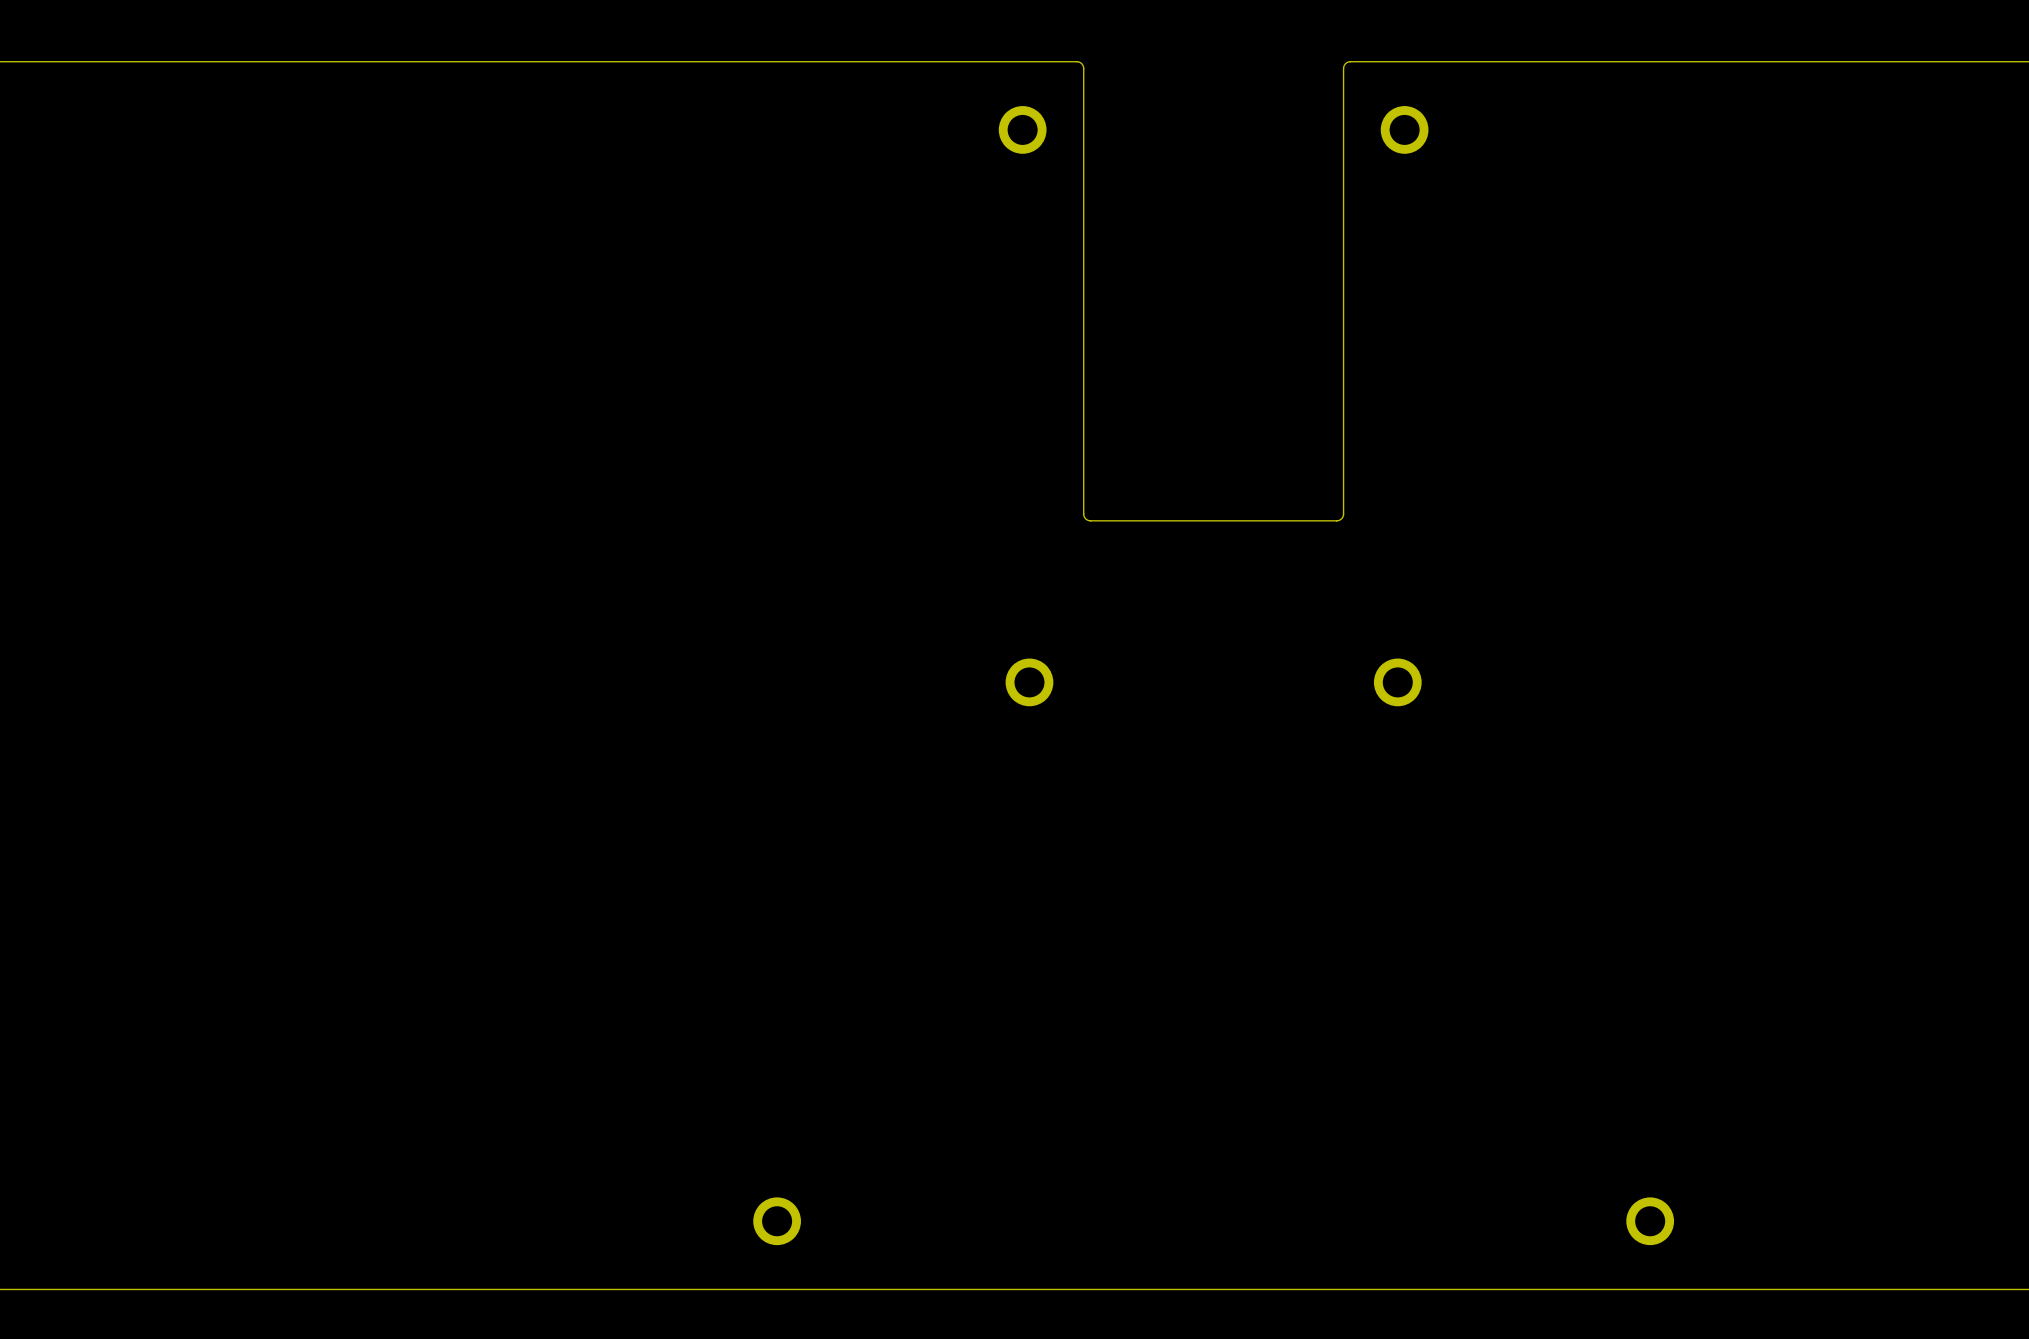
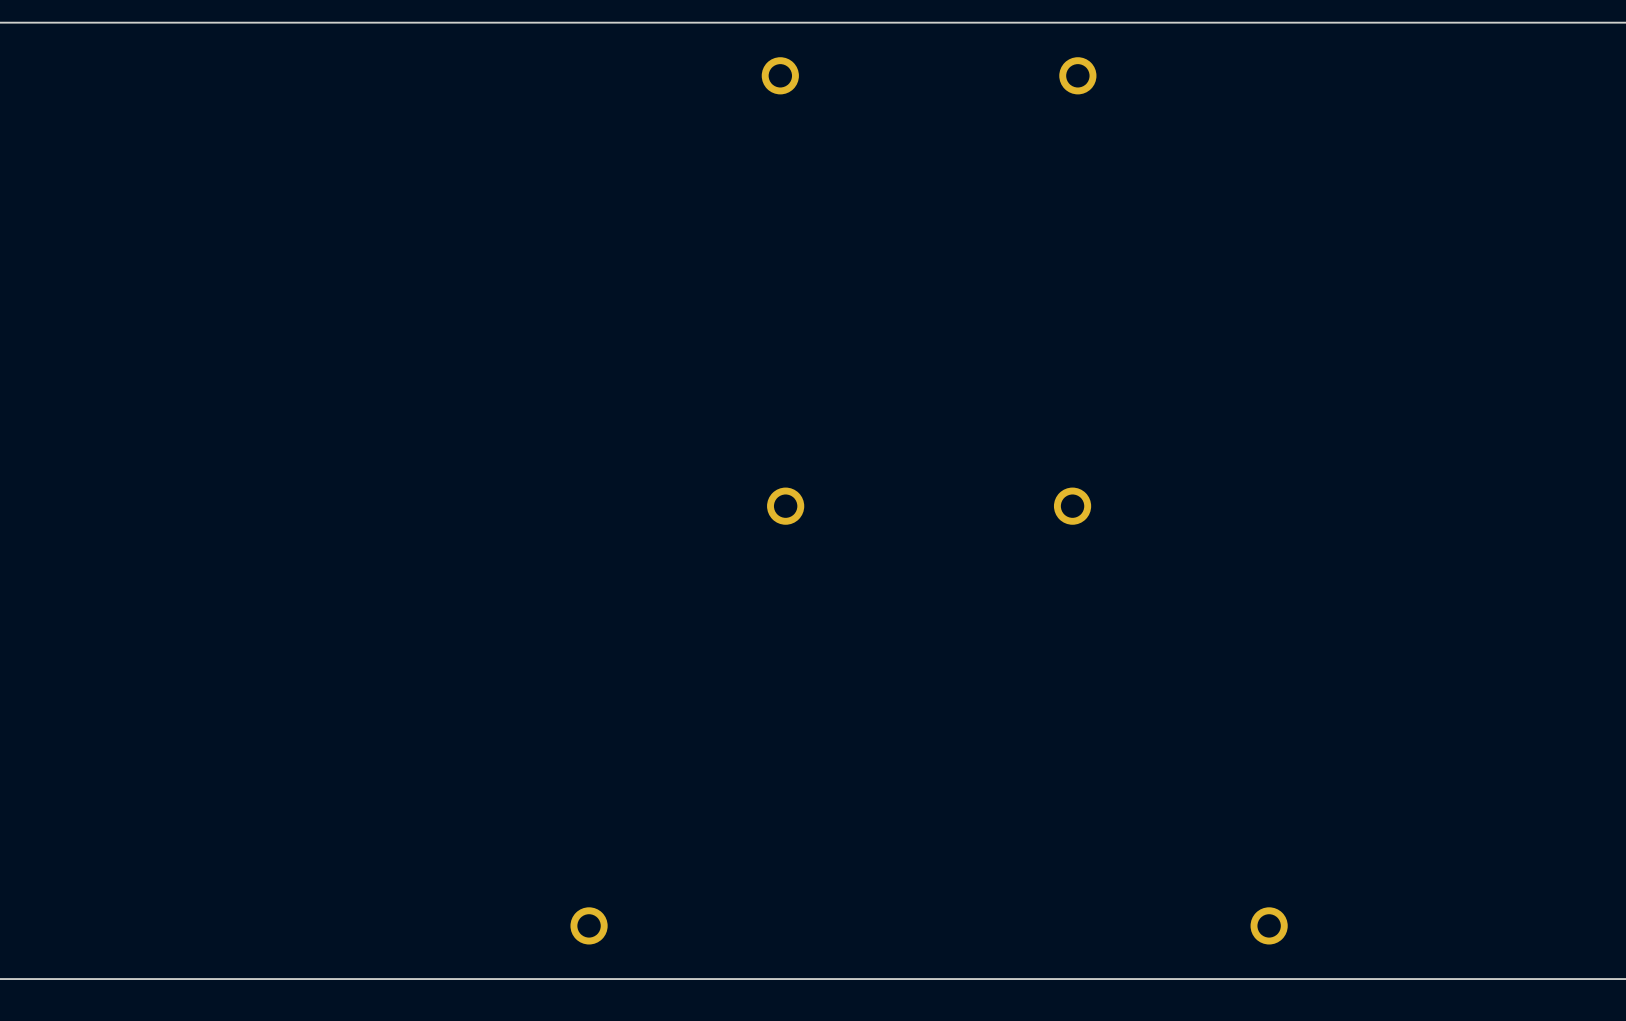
board edge: (1350, 61) (1345, 63) (1343, 68) (1343, 514) (1341, 518) (1336, 520) (1090, 520) (1084, 517) (1083, 68) (1081, 63) (1076, 61) -> (1035, 22) (822, 22)

